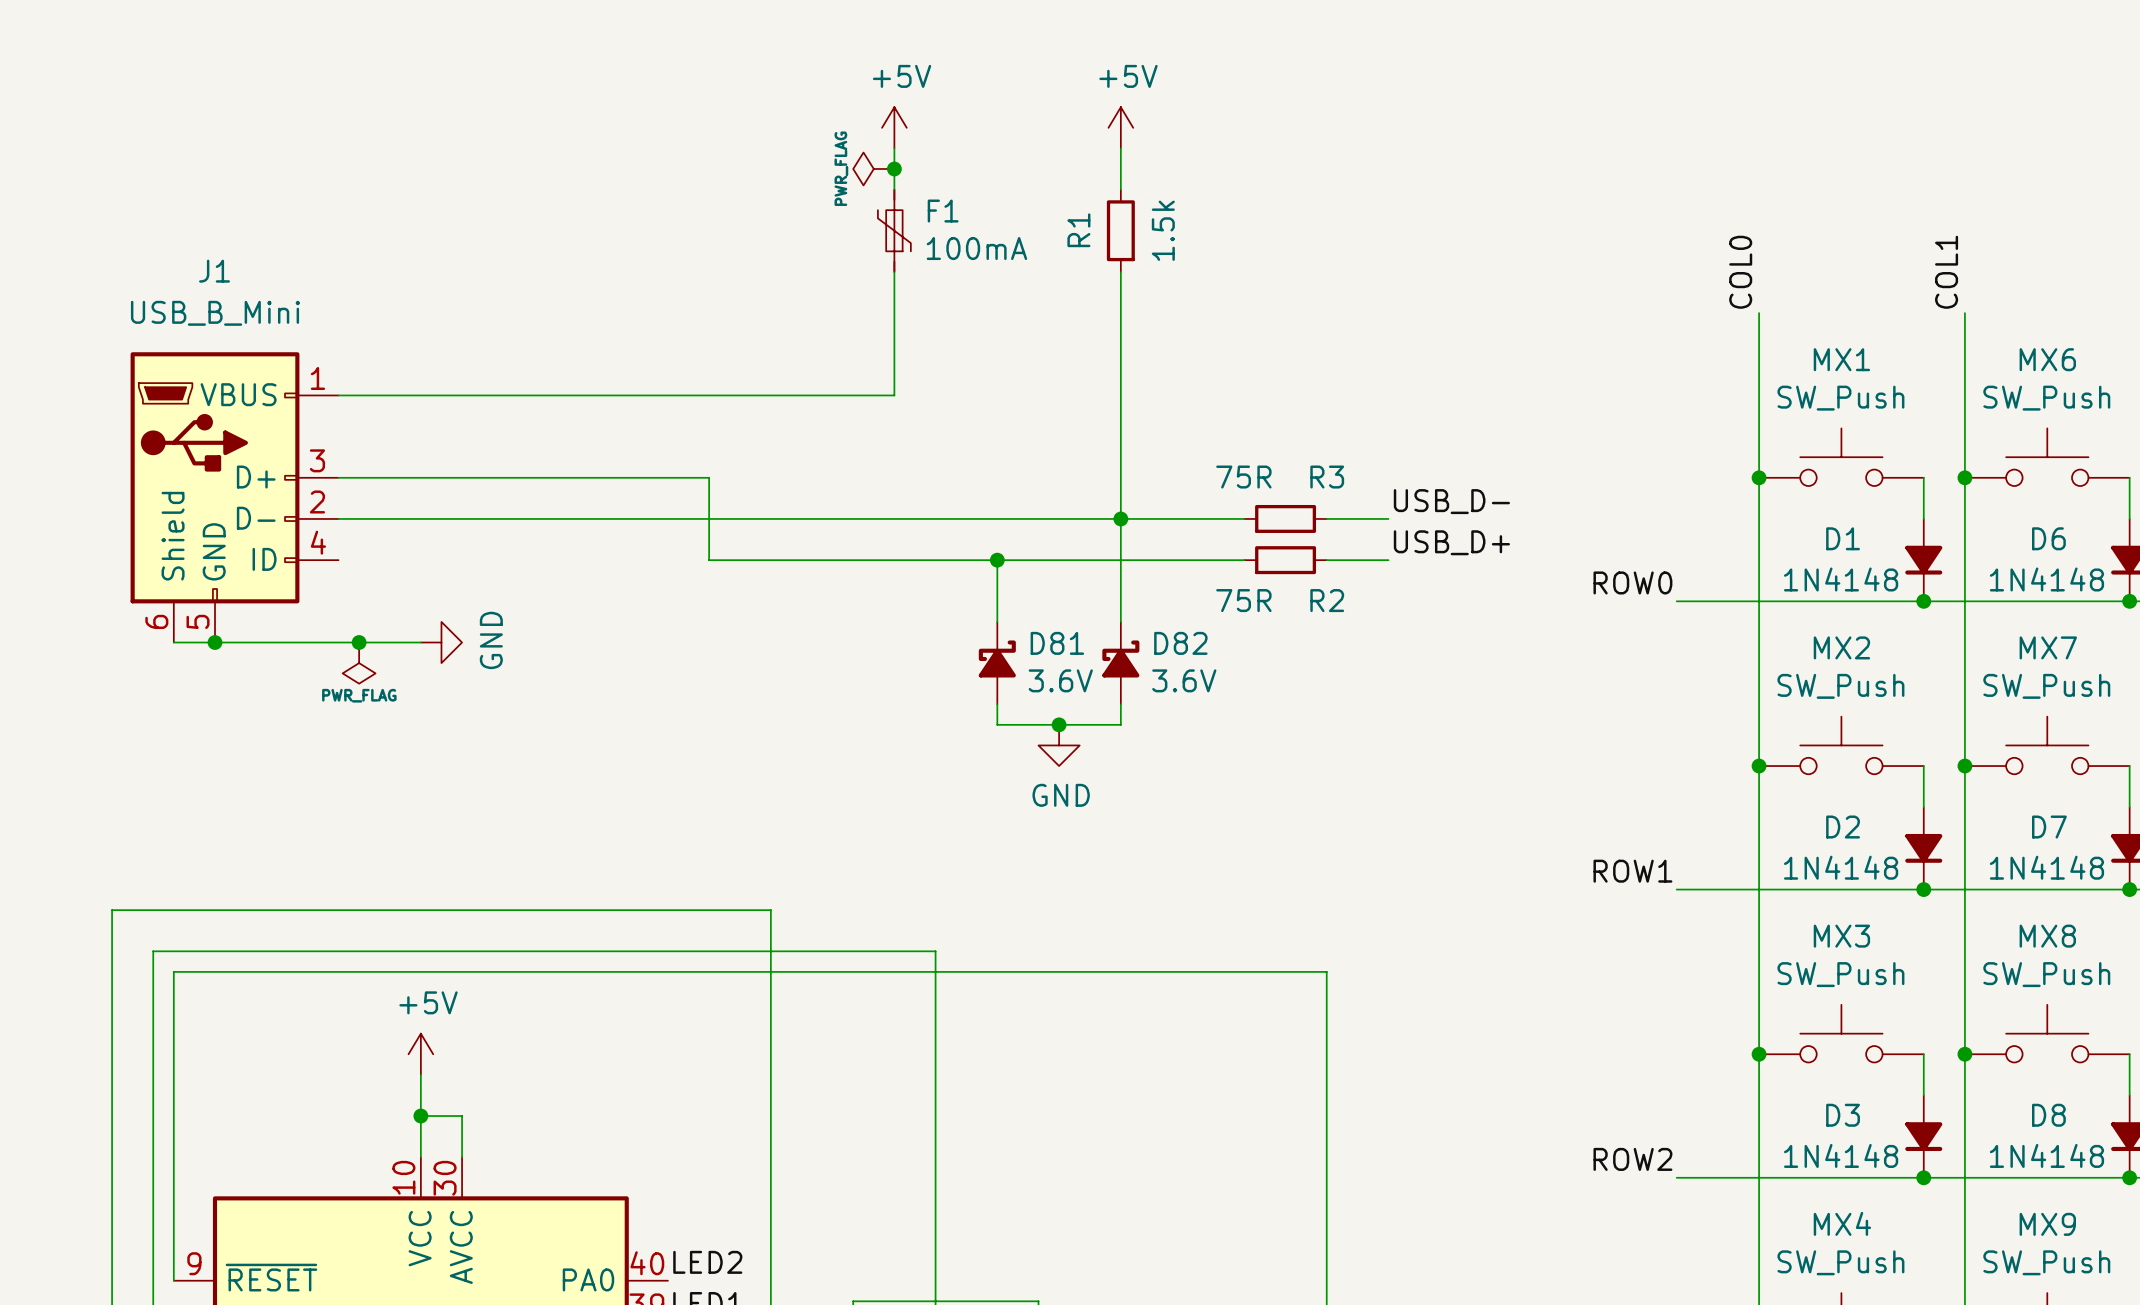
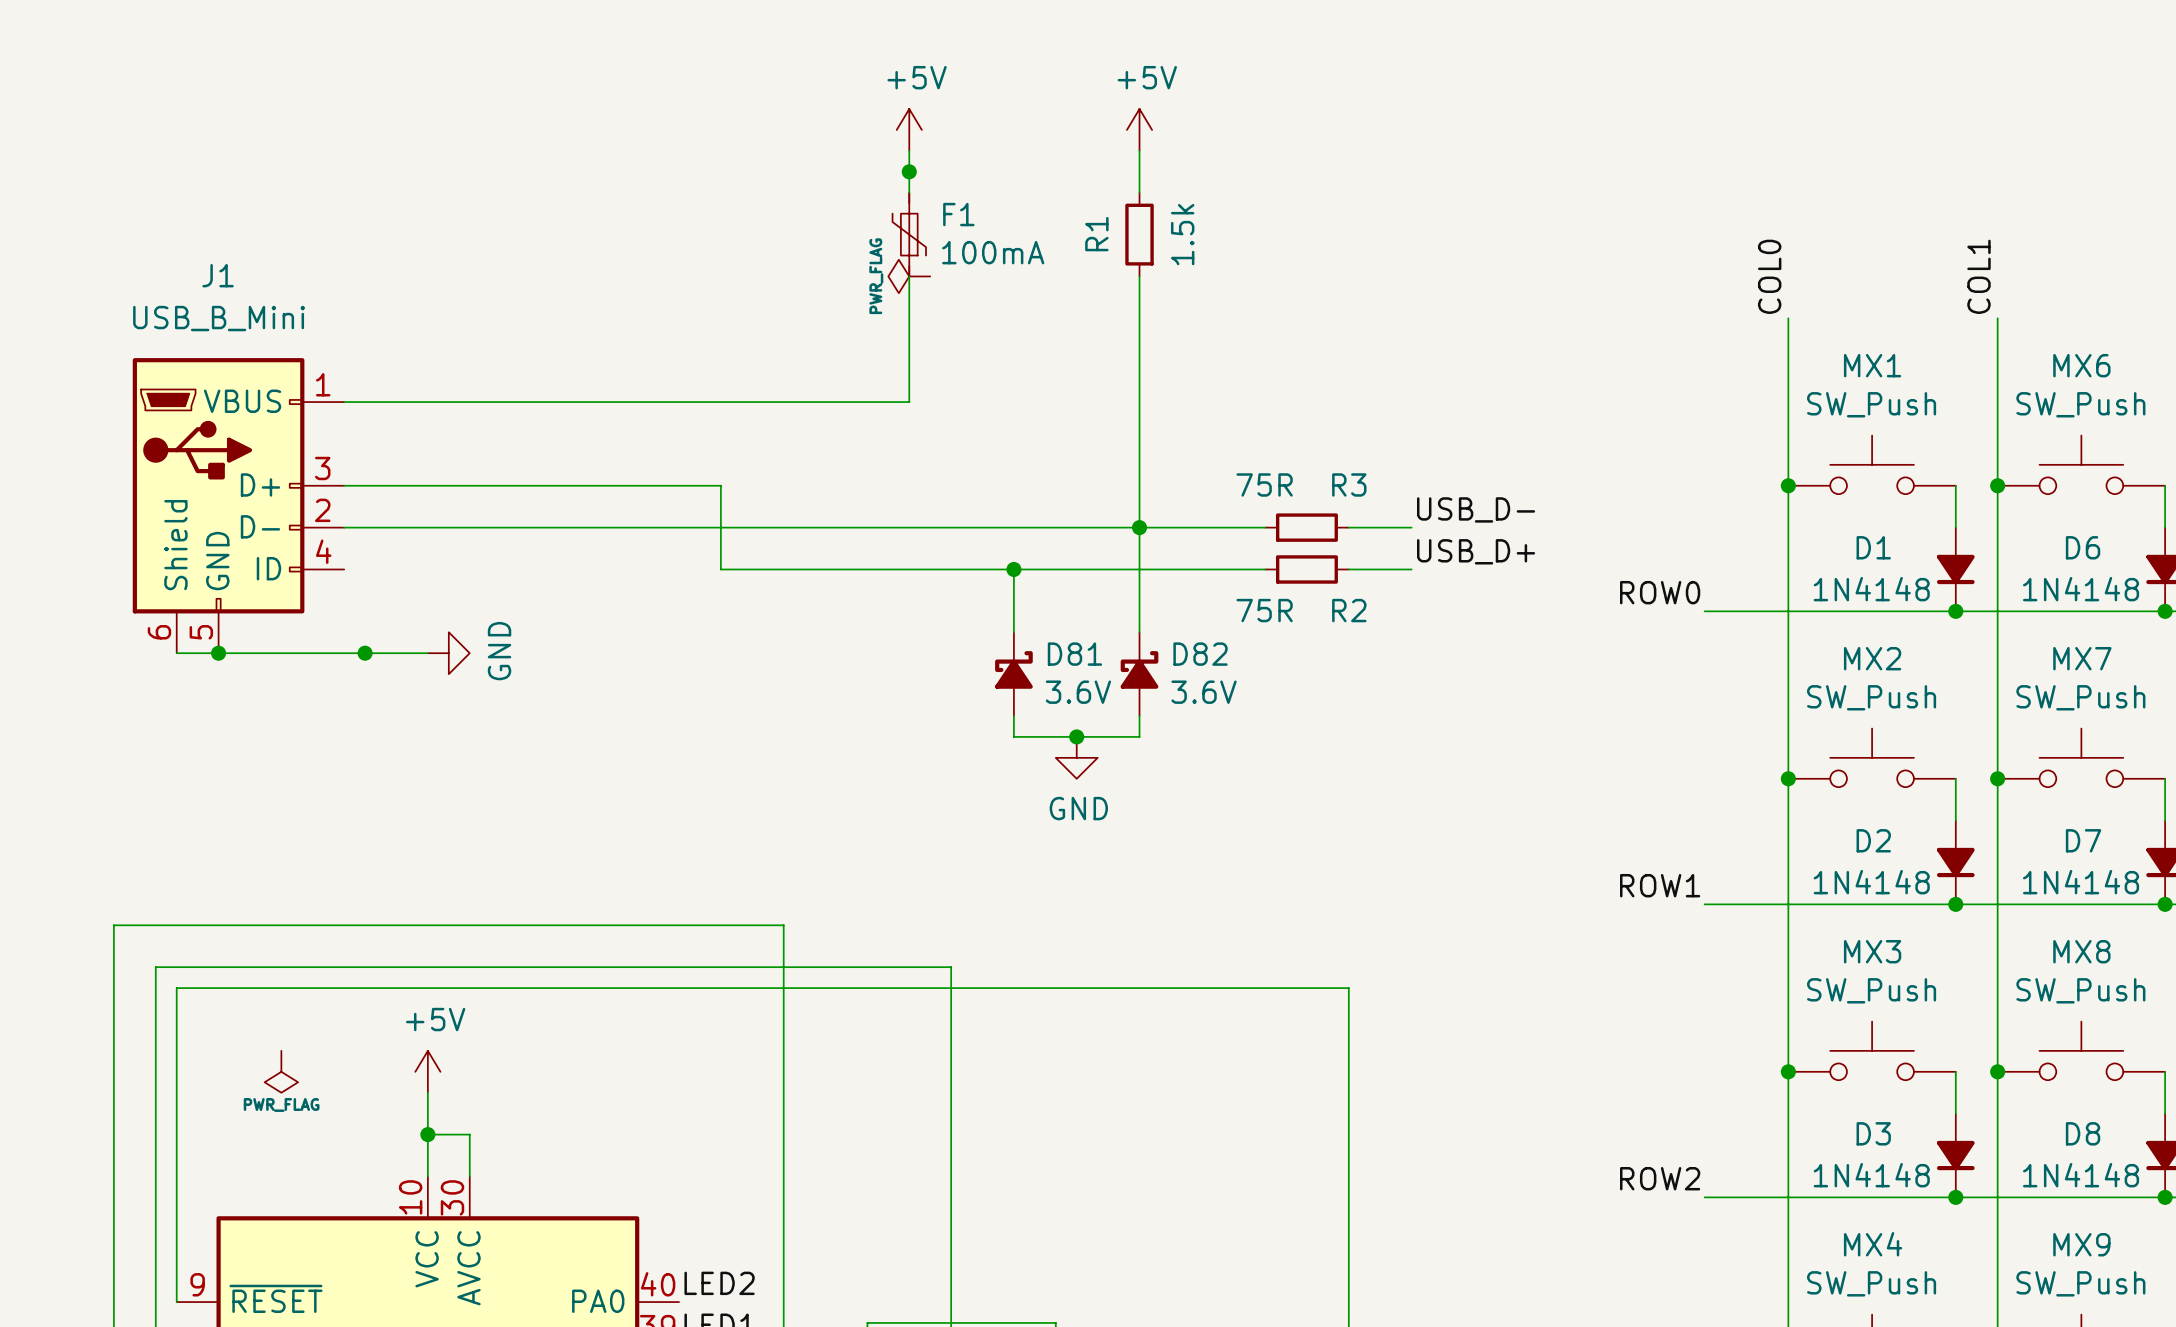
power symbol position: PWR_FLAG (873, 168) -> PWR_FLAG (909, 276)
power symbol: PWR_FLAG (359, 663) -> none
power symbol: none -> PWR_FLAG (281, 1071)

